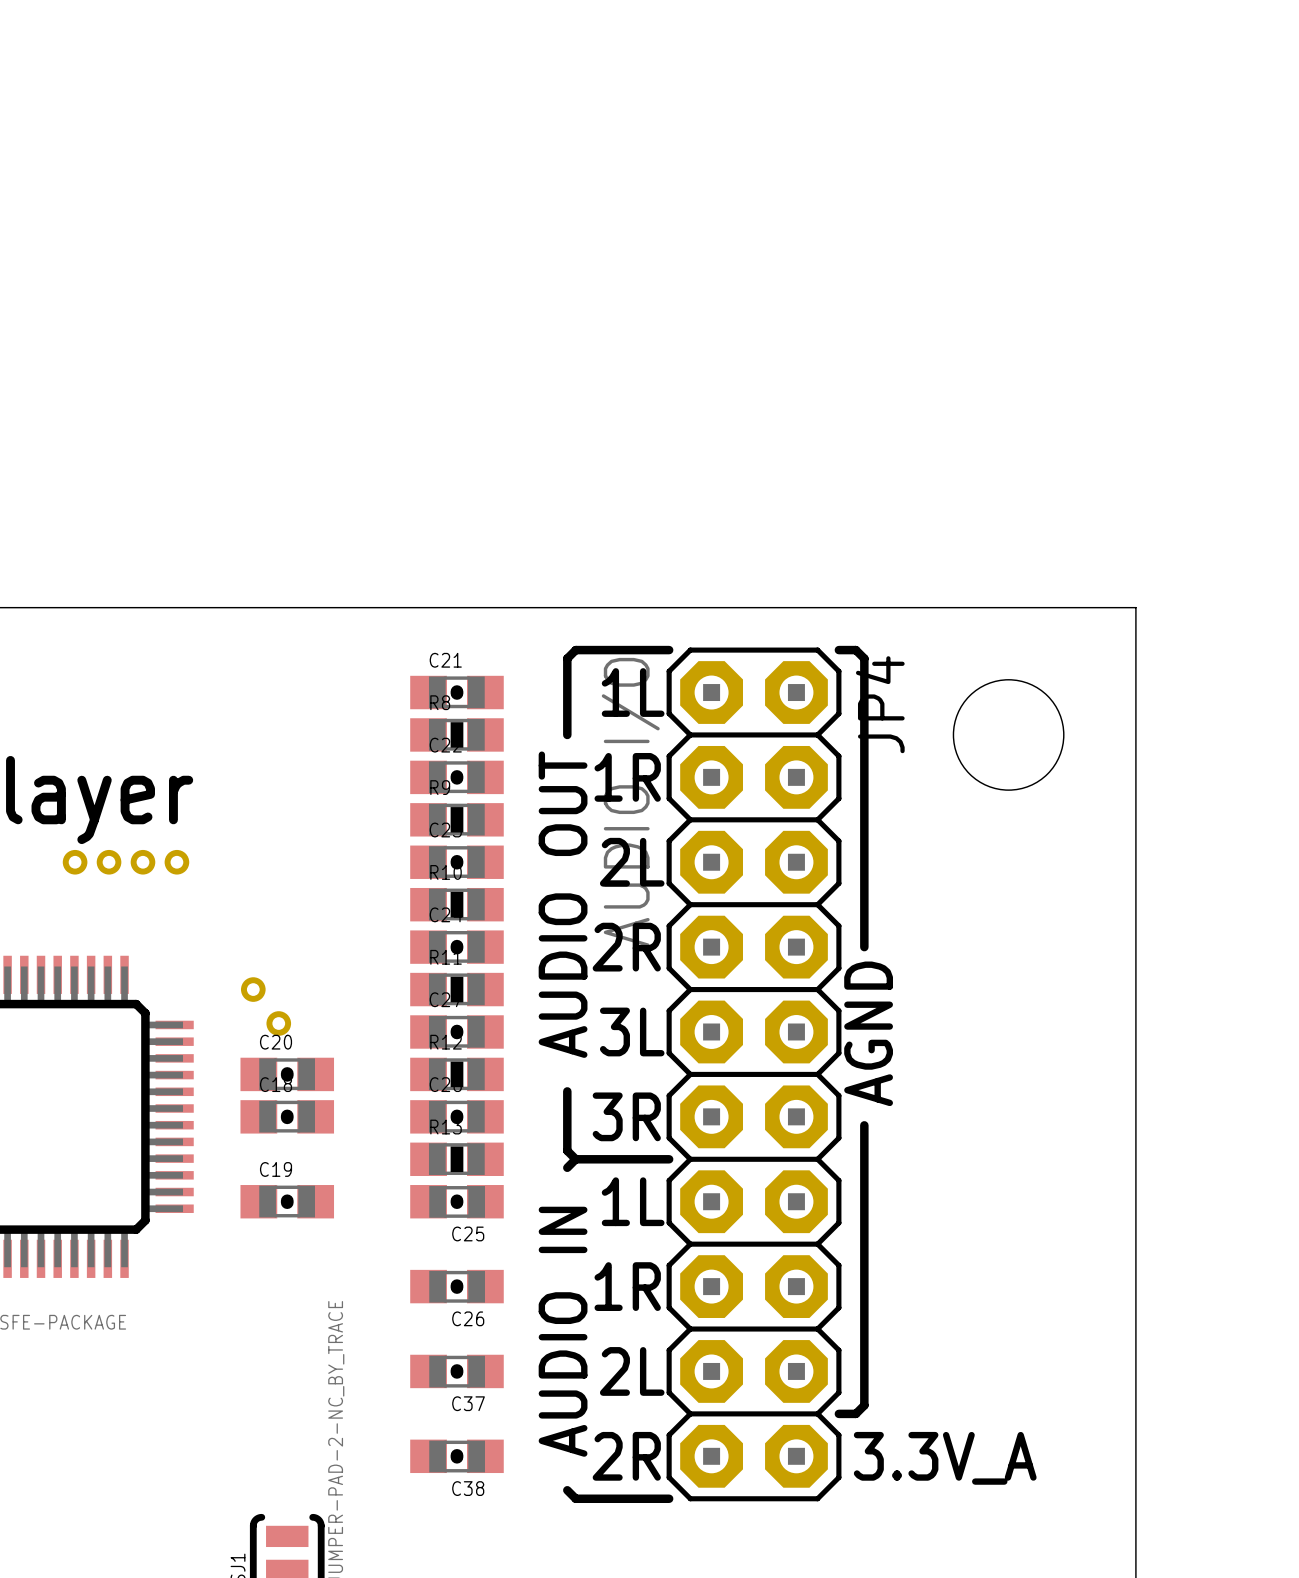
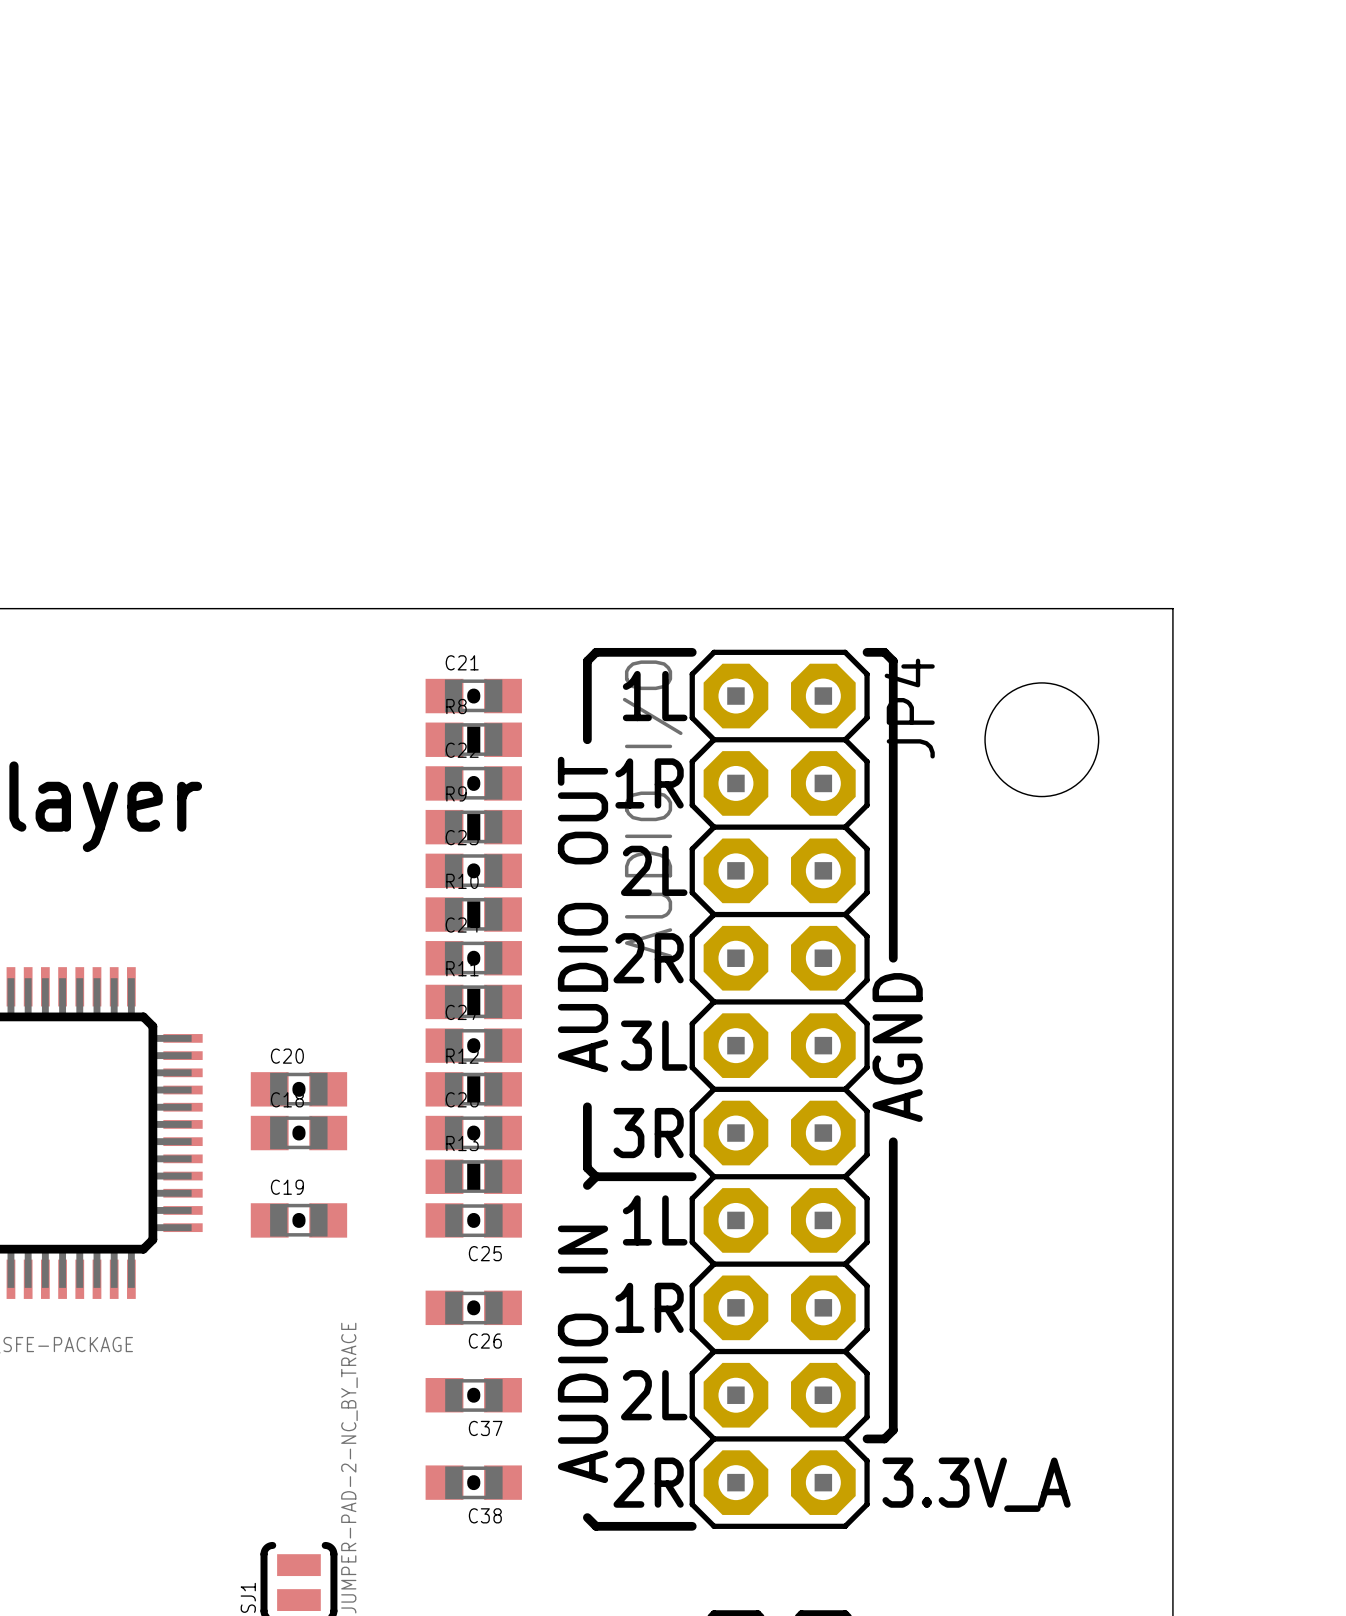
part: (75, 862) -> none
part: (109, 862) -> none
part: (142, 862) -> none
part: (176, 862) -> none
part: (253, 989) -> none
part: (278, 1023) -> none

